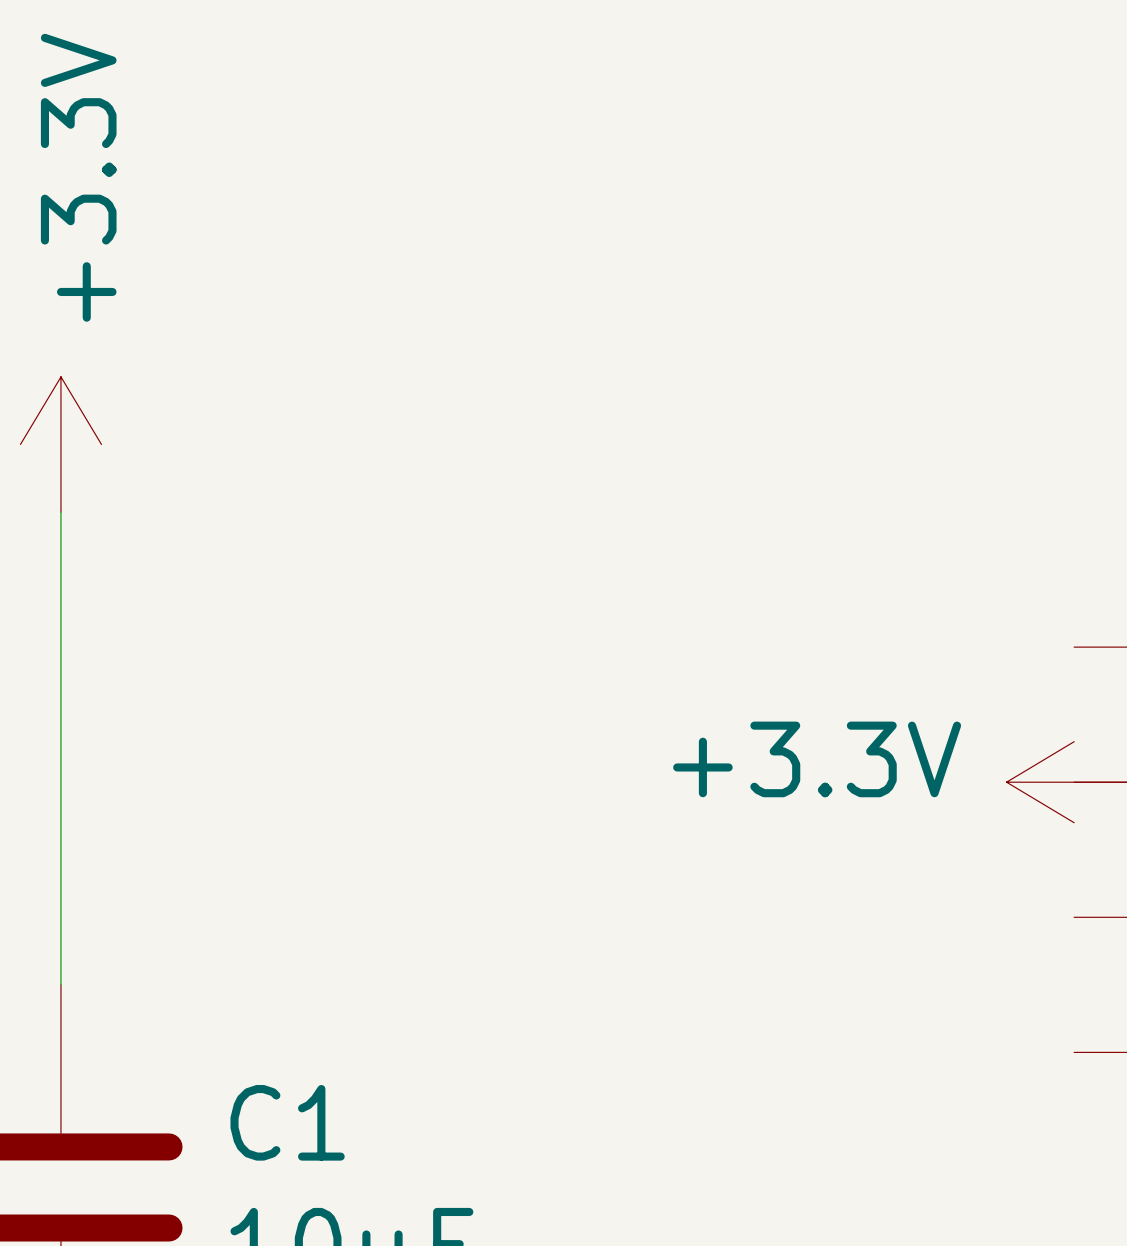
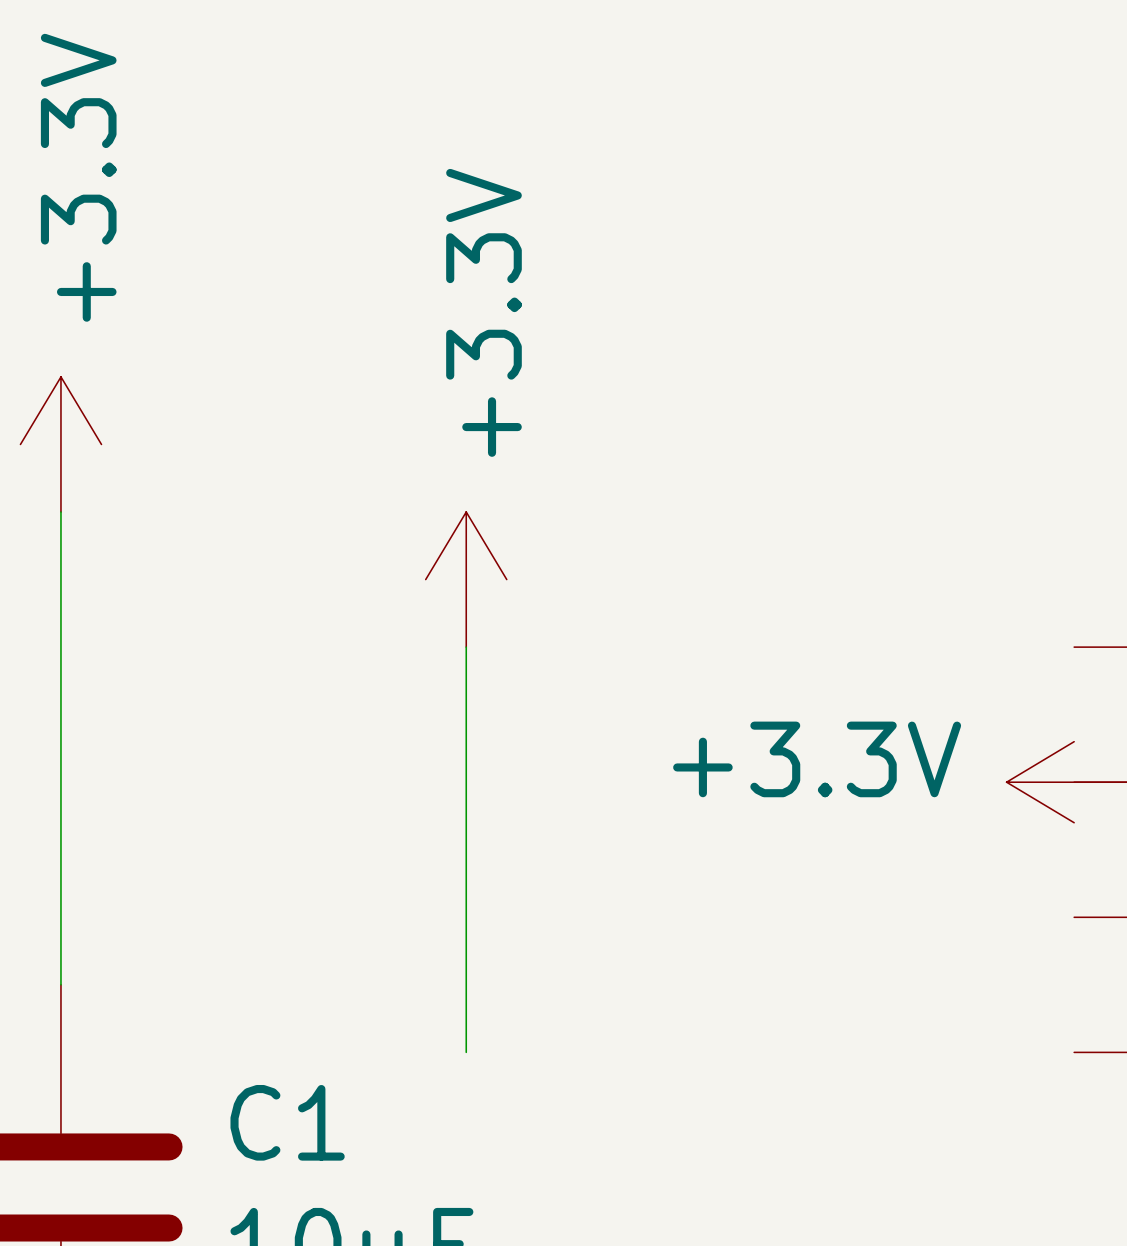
power symbol: none -> +3.3V (466, 579)
wire: none -> (466, 647) (466, 1052)

